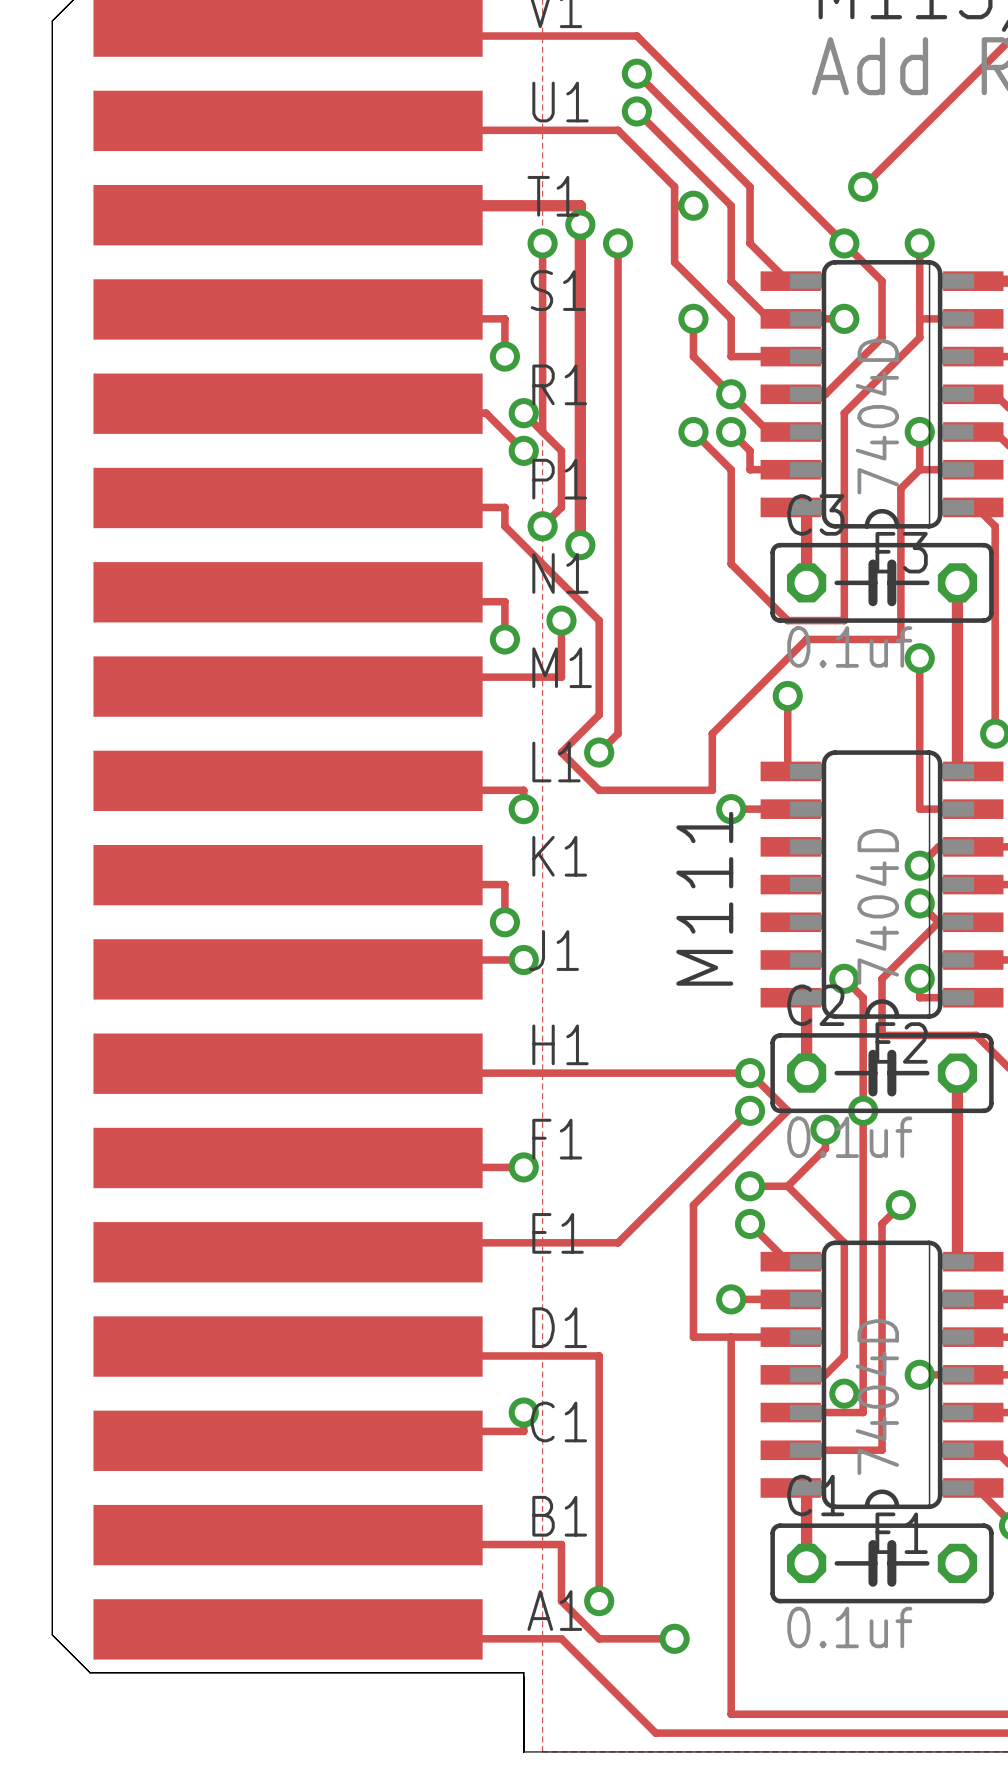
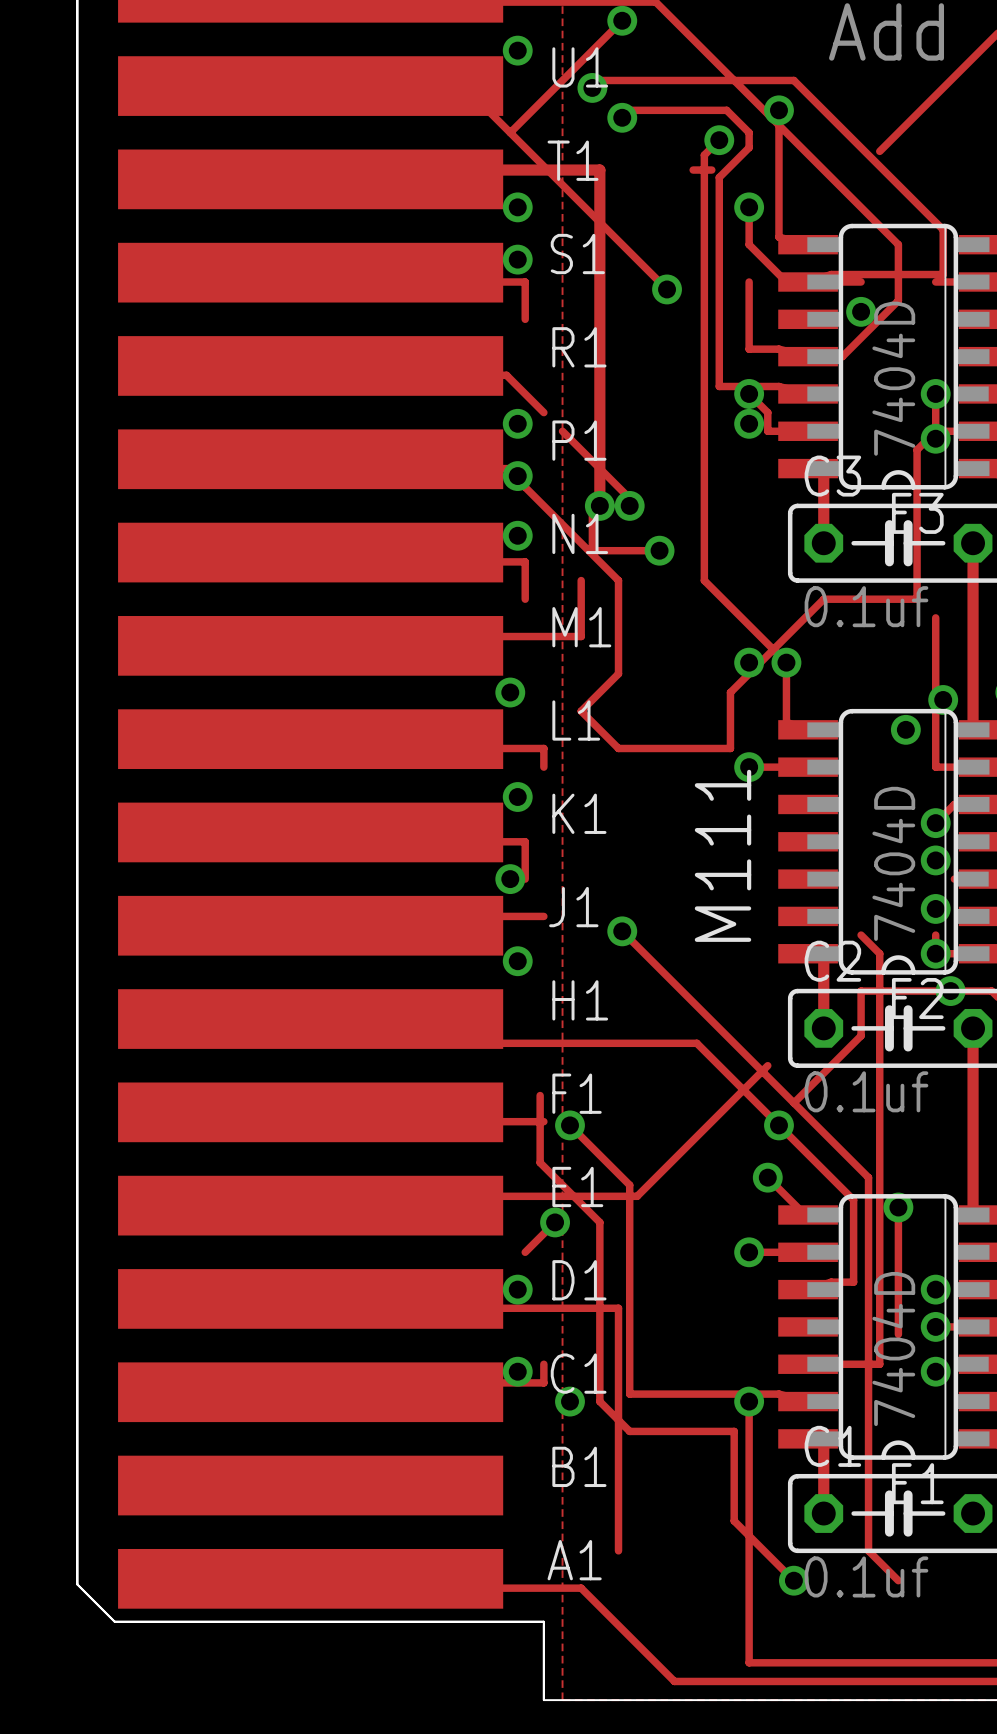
track: none -> (622, 20) (510, 132)
via: none -> (622, 20)
track: (636, 73) (708, 145) -> (622, 117) (622, 110) (726, 110)
via: (636, 73) -> none
via: none -> (517, 50)
track: (636, 111) (731, 205) (731, 243) -> none
via: (636, 111) -> none
track: (288, 120) (297, 130) (618, 130) (674, 186) (674, 262) (731, 318) -> (310, 86) (487, 110) (667, 289)
track: none -> (592, 87) (592, 80) (793, 80) (943, 229) (943, 274) (831, 274) (808, 282)
via: none -> (592, 87)
via: none -> (778, 110)
via: none -> (622, 117)
track: (731, 168) (750, 186) (750, 243) (787, 281) (790, 281) -> (778, 110) (778, 237) (808, 244)
via: none -> (719, 140)
via: (863, 186) -> none
via: (693, 205) -> none
via: (580, 224) -> none
via: none -> (517, 207)
track: (542, 243) (542, 432) -> none
via: (542, 243) -> none
track: (618, 243) (618, 733) (599, 752) -> none
via: (618, 243) -> none
via: none -> (749, 207)
via: (844, 243) -> none
track: (919, 243) (919, 337) (844, 413) (844, 620) (787, 620) (731, 564) (731, 469) (693, 432) -> none
via: (919, 243) -> none
via: none -> (517, 259)
track: (693, 318) (693, 356) (768, 432) (790, 432) -> (749, 132) (749, 147) (719, 177) (719, 386) (778, 386) (808, 393)
via: (693, 318) -> none
via position: (844, 318) -> (861, 311)
via: none -> (667, 289)
via: (504, 356) -> none
track: (731, 356) (790, 356) -> (749, 319) (749, 349) (778, 349) (808, 356)
via: (731, 394) -> none
track: (523, 413) (561, 450) (561, 507) (542, 526) -> none
via: (523, 413) -> none
via: (693, 432) -> none
via position: (523, 450) -> (517, 423)
via: none -> (749, 423)
track: none -> (562, 431) (629, 498) (629, 505)
via: none -> (935, 438)
via: none -> (517, 476)
via: (542, 526) -> none
track: none -> (592, 505) (592, 550) (659, 550)
via: none -> (629, 505)
via: none -> (517, 535)
via: none -> (659, 550)
via: (561, 620) -> none
via: (504, 639) -> none
via: (919, 658) -> none
track: (787, 696) (787, 771) (790, 771) -> (719, 140) (704, 155) (704, 580) (786, 662) (786, 722) (808, 729)
via position: (787, 696) -> (786, 662)
via: none -> (749, 662)
via: none -> (510, 692)
via: none -> (943, 699)
via: (599, 752) -> none
via: none -> (905, 729)
via position: (523, 809) -> (517, 797)
track: (919, 903) (938, 922) (882, 978) (882, 1035) -> (793, 1103) (861, 1035) (861, 991) (898, 991)
via position: (504, 922) -> (510, 879)
via: none -> (935, 908)
via: (523, 959) -> none
track: none -> (622, 931) (868, 1177) (868, 1550) (898, 1580)
via: none -> (622, 931)
via: (844, 978) -> none
via: (919, 978) -> none
via: none -> (935, 953)
via: none -> (517, 961)
via: none -> (950, 991)
track: (288, 1063) (297, 1073) (750, 1073) (787, 1110) (693, 1205) (693, 1337) (790, 1337) -> (310, 1019) (487, 1043) (696, 1043) (853, 1200) (853, 1282) (831, 1282) (808, 1289)
via: (750, 1073) -> none
via: (750, 1110) -> none
via: (863, 1110) -> none
track: (825, 1129) (825, 1148) (787, 1186) -> none
via: (825, 1129) -> none
track: none -> (540, 1095) (540, 1162) (599, 1222) (599, 1401) (629, 1431) (734, 1431) (734, 1520) (793, 1580)
via position: (523, 1167) -> (570, 1125)
track: (750, 1186) (787, 1186) -> none
via position: (750, 1186) -> (778, 1125)
track: (787, 1186) (844, 1242) (844, 1355) (825, 1374) (790, 1374) -> none
track: (900, 1205) (882, 1223) (882, 1254) -> none
via position: (900, 1205) -> (898, 1207)
track: none -> (555, 1222) (525, 1252)
via: none -> (555, 1222)
via: none -> (517, 1289)
track: (731, 1337) (731, 1442) -> none
via: none -> (935, 1289)
track: (882, 1382) (882, 1450) (790, 1450) -> (570, 1125) (629, 1185) (629, 1394) (778, 1394) (808, 1401)
via: (844, 1393) -> none
via position: (523, 1412) -> (517, 1371)
via: none -> (935, 1371)
via: none -> (570, 1401)
via: none -> (749, 1401)
track: (288, 1535) (297, 1544) (561, 1544) (561, 1601) (599, 1638) (674, 1638) -> none
via: (599, 1601) -> none
via: none -> (793, 1580)
via: (674, 1638) -> none

